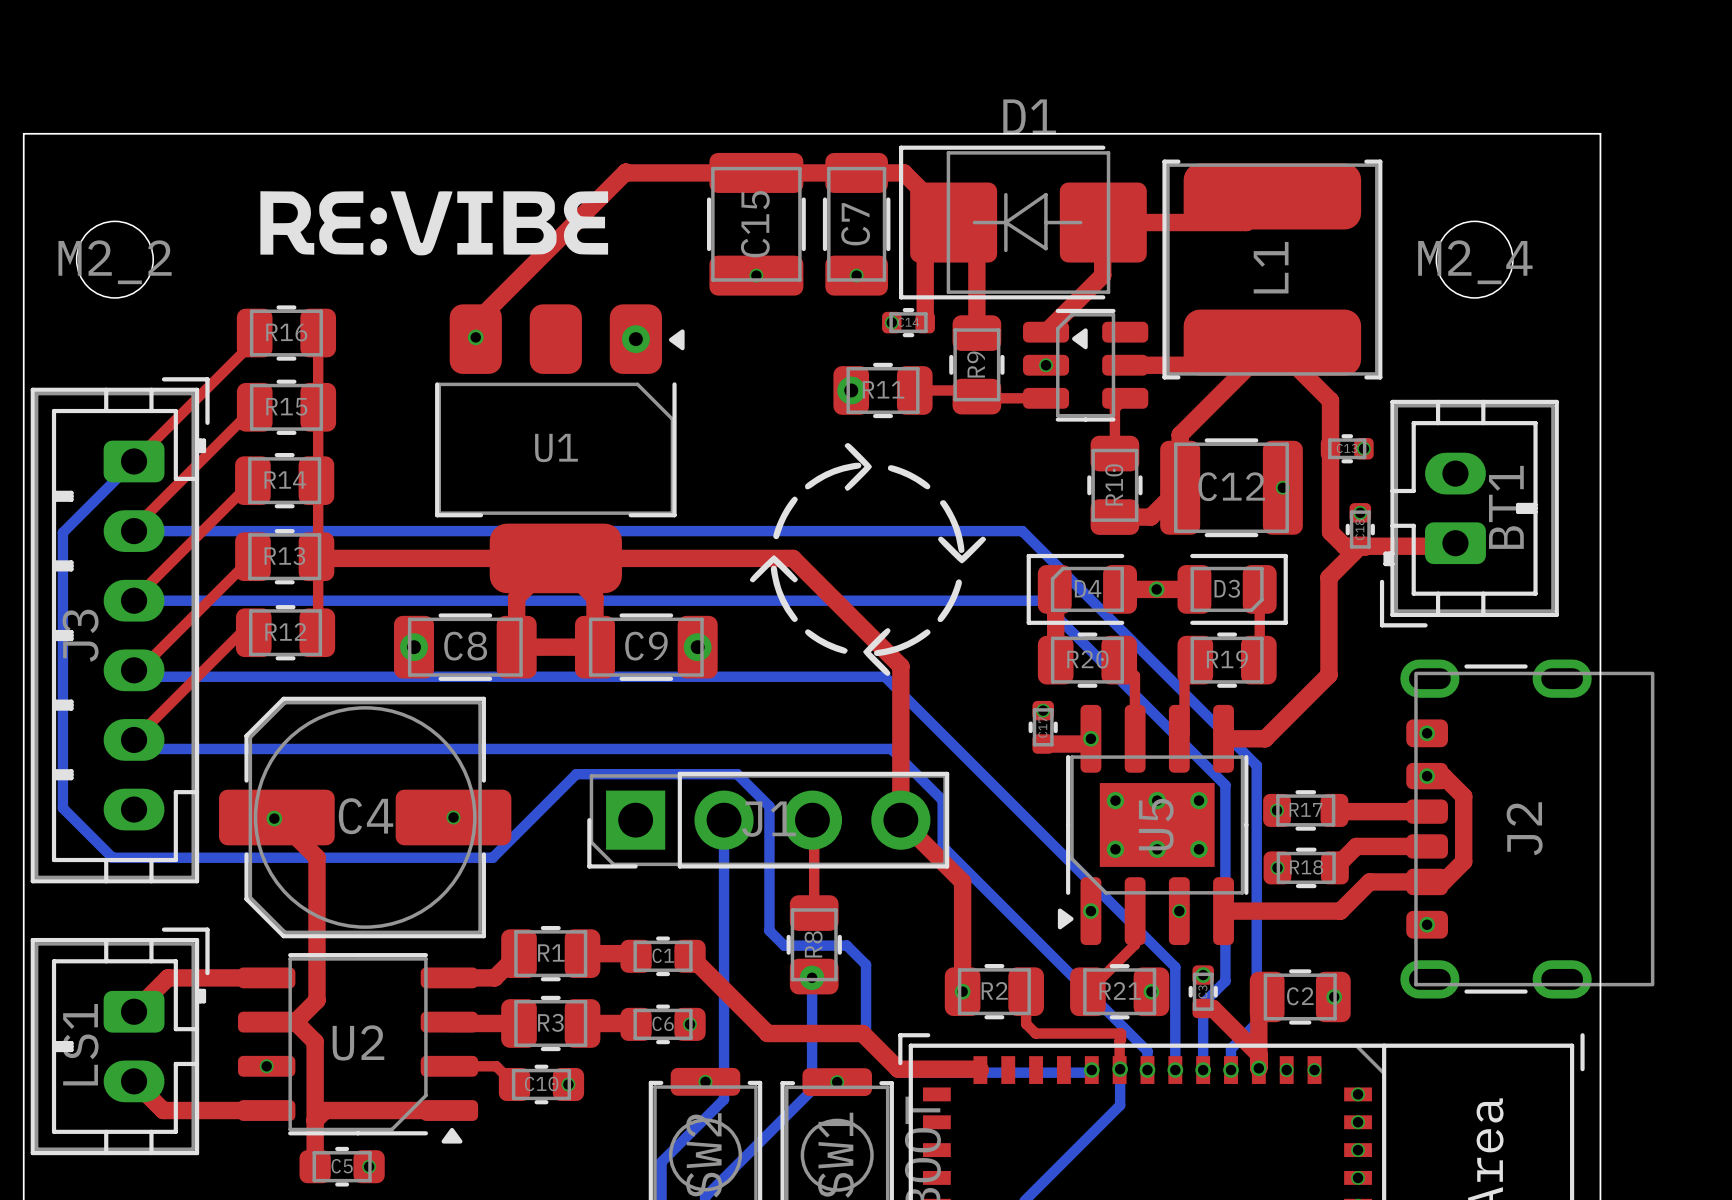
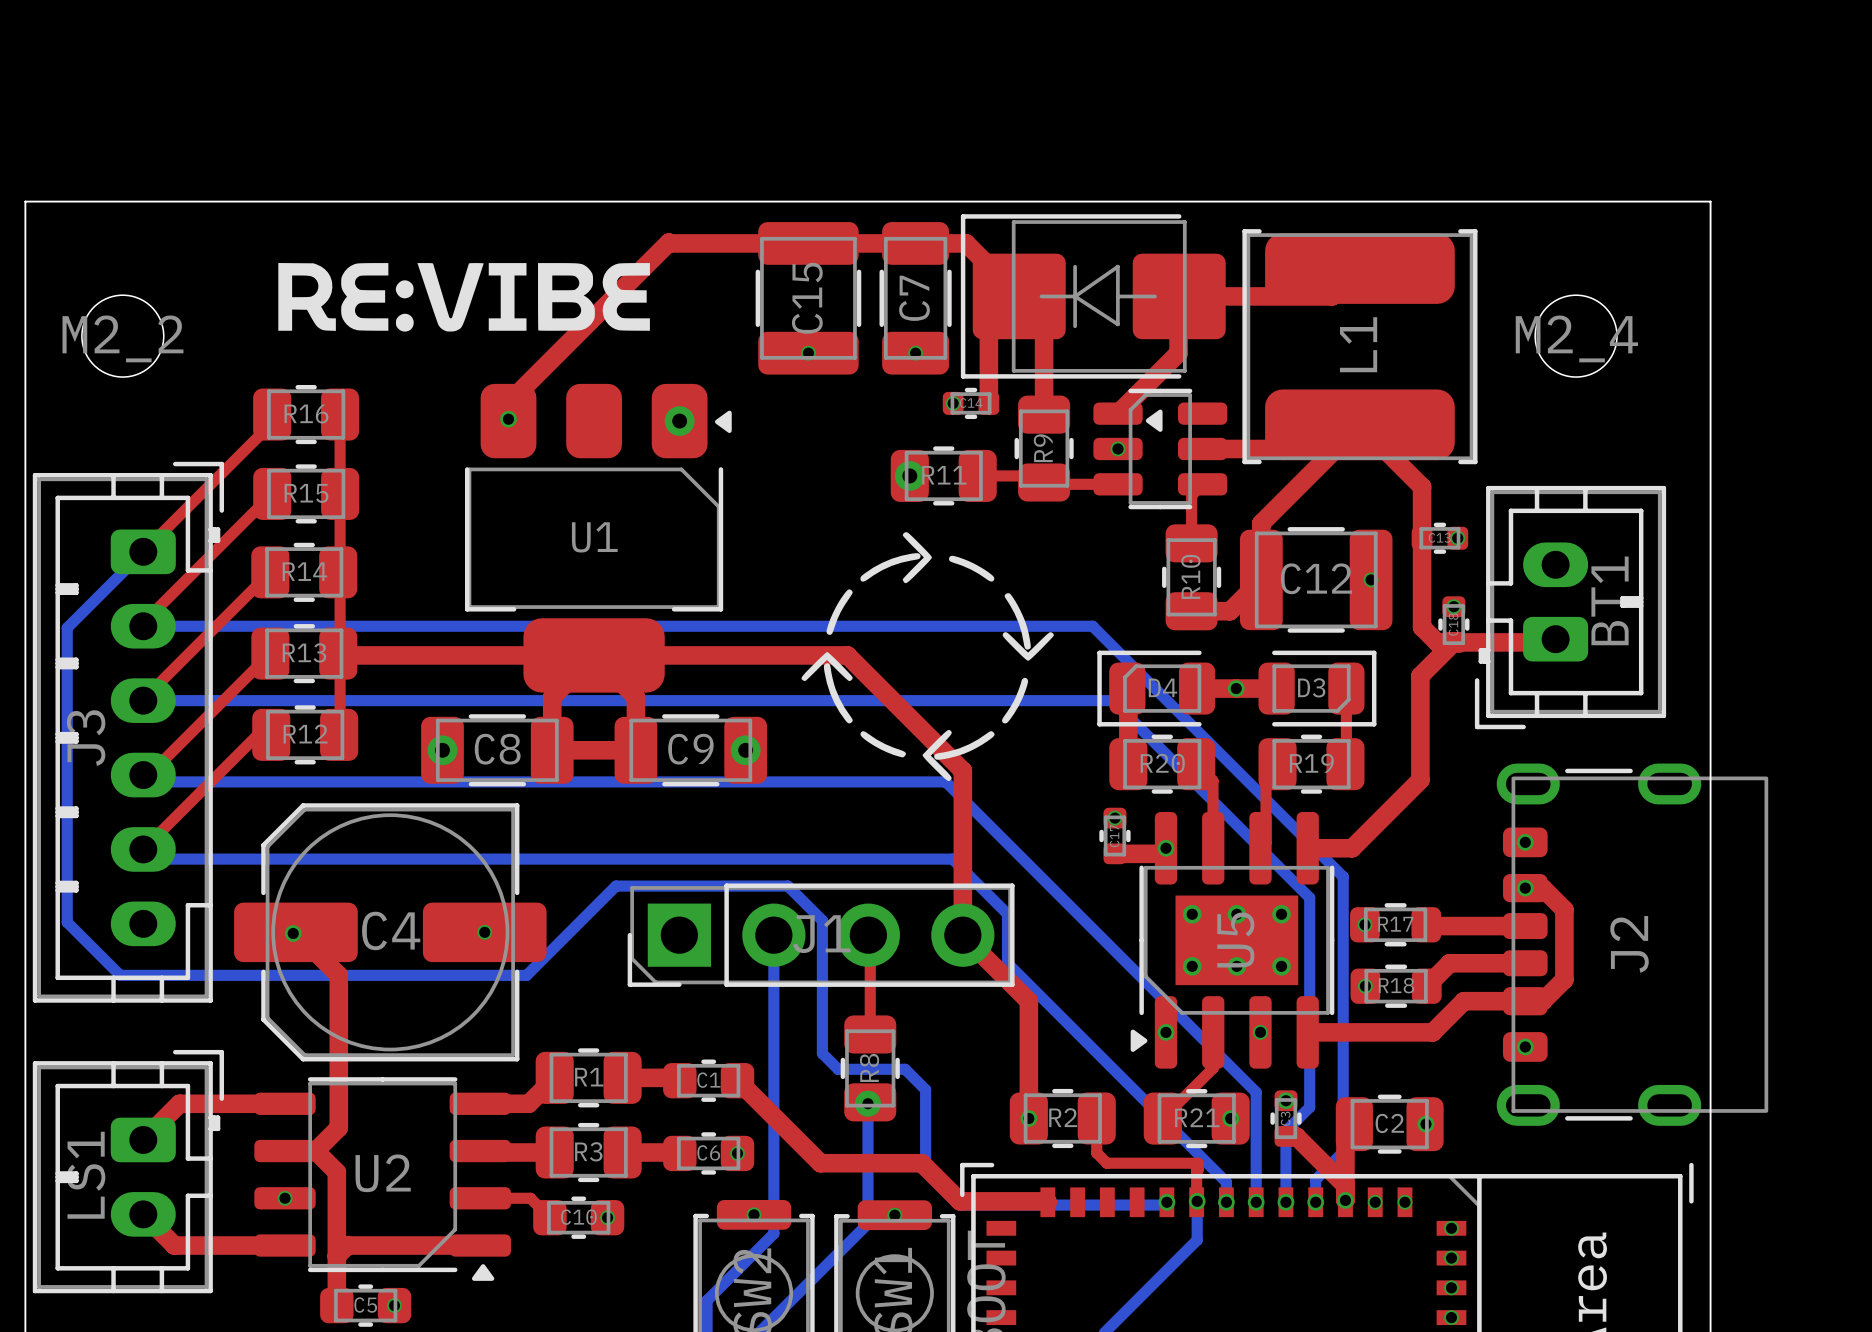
D1 name: D1 (1029, 116) -> none

